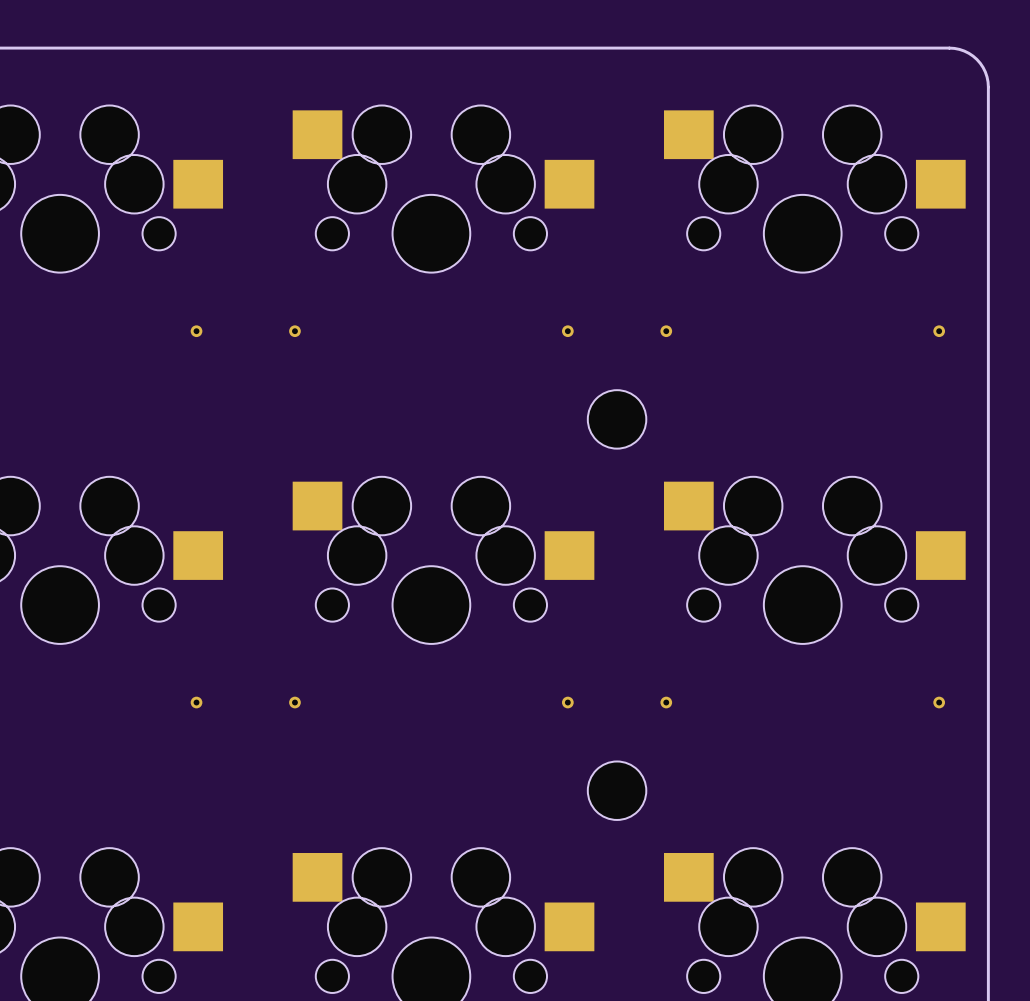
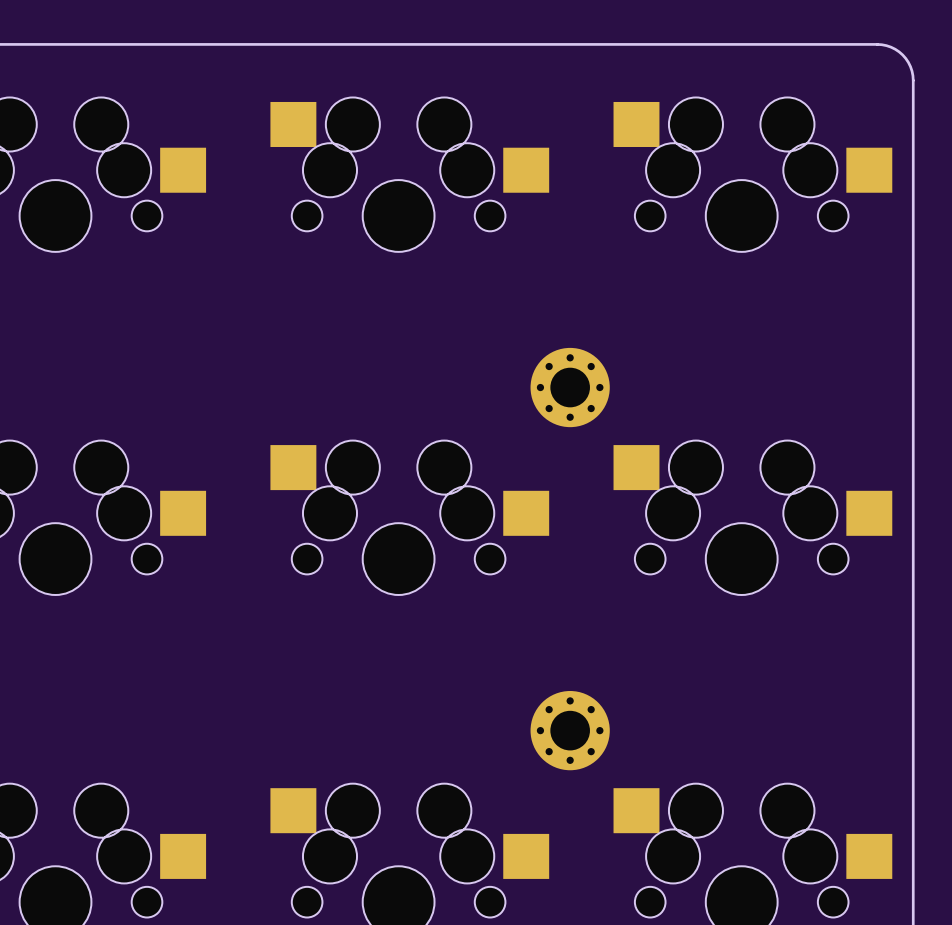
part: (196, 331) -> none
part: (294, 331) -> none
part: (567, 331) -> none
part: (666, 331) -> none
part: (939, 331) -> none
part footprint: [587, 390, 647, 449] -> [530, 347, 610, 428]
part: (196, 702) -> none
part: (294, 702) -> none
part: (567, 702) -> none
part: (666, 702) -> none
part: (939, 702) -> none
part footprint: [587, 761, 647, 820] -> [530, 691, 610, 771]

